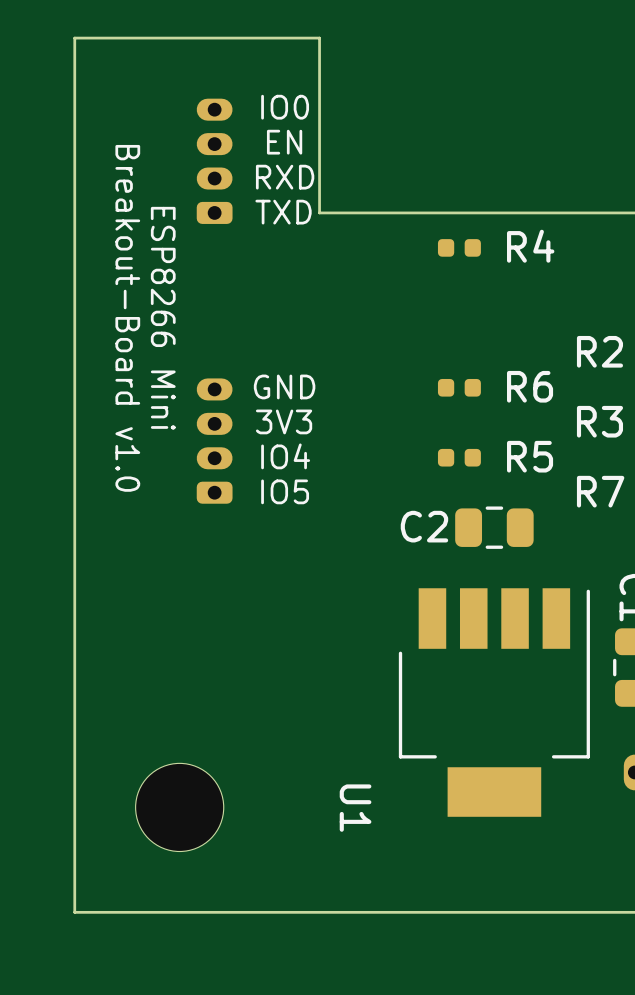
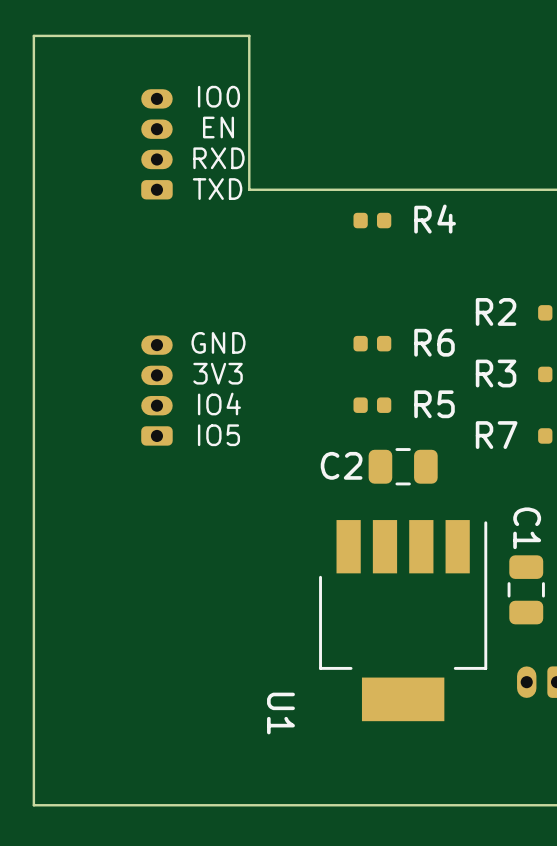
text: Breakout-Board v1.0 (127, 318) -> none
text: ESP8266 Mini (163, 318) -> none
part: (179, 807) -> none

